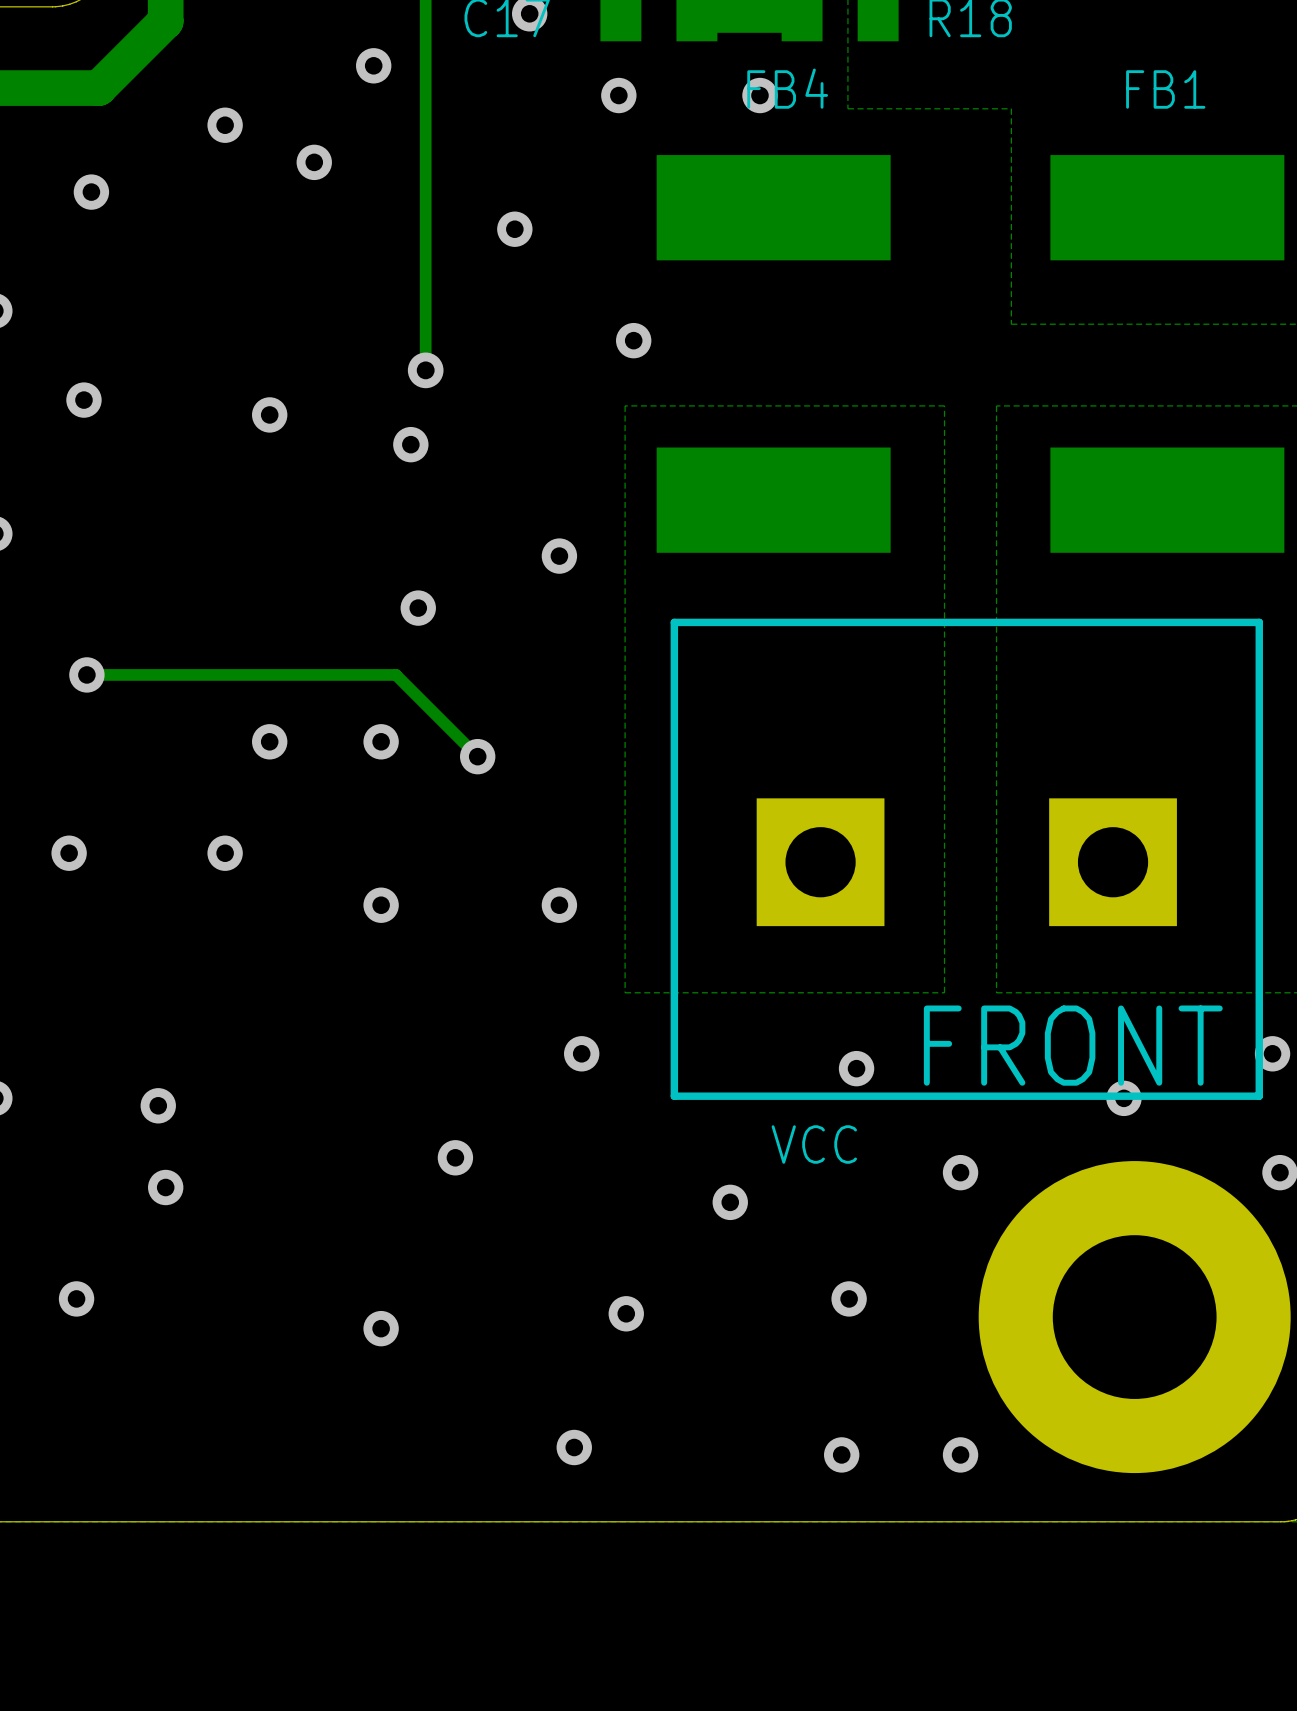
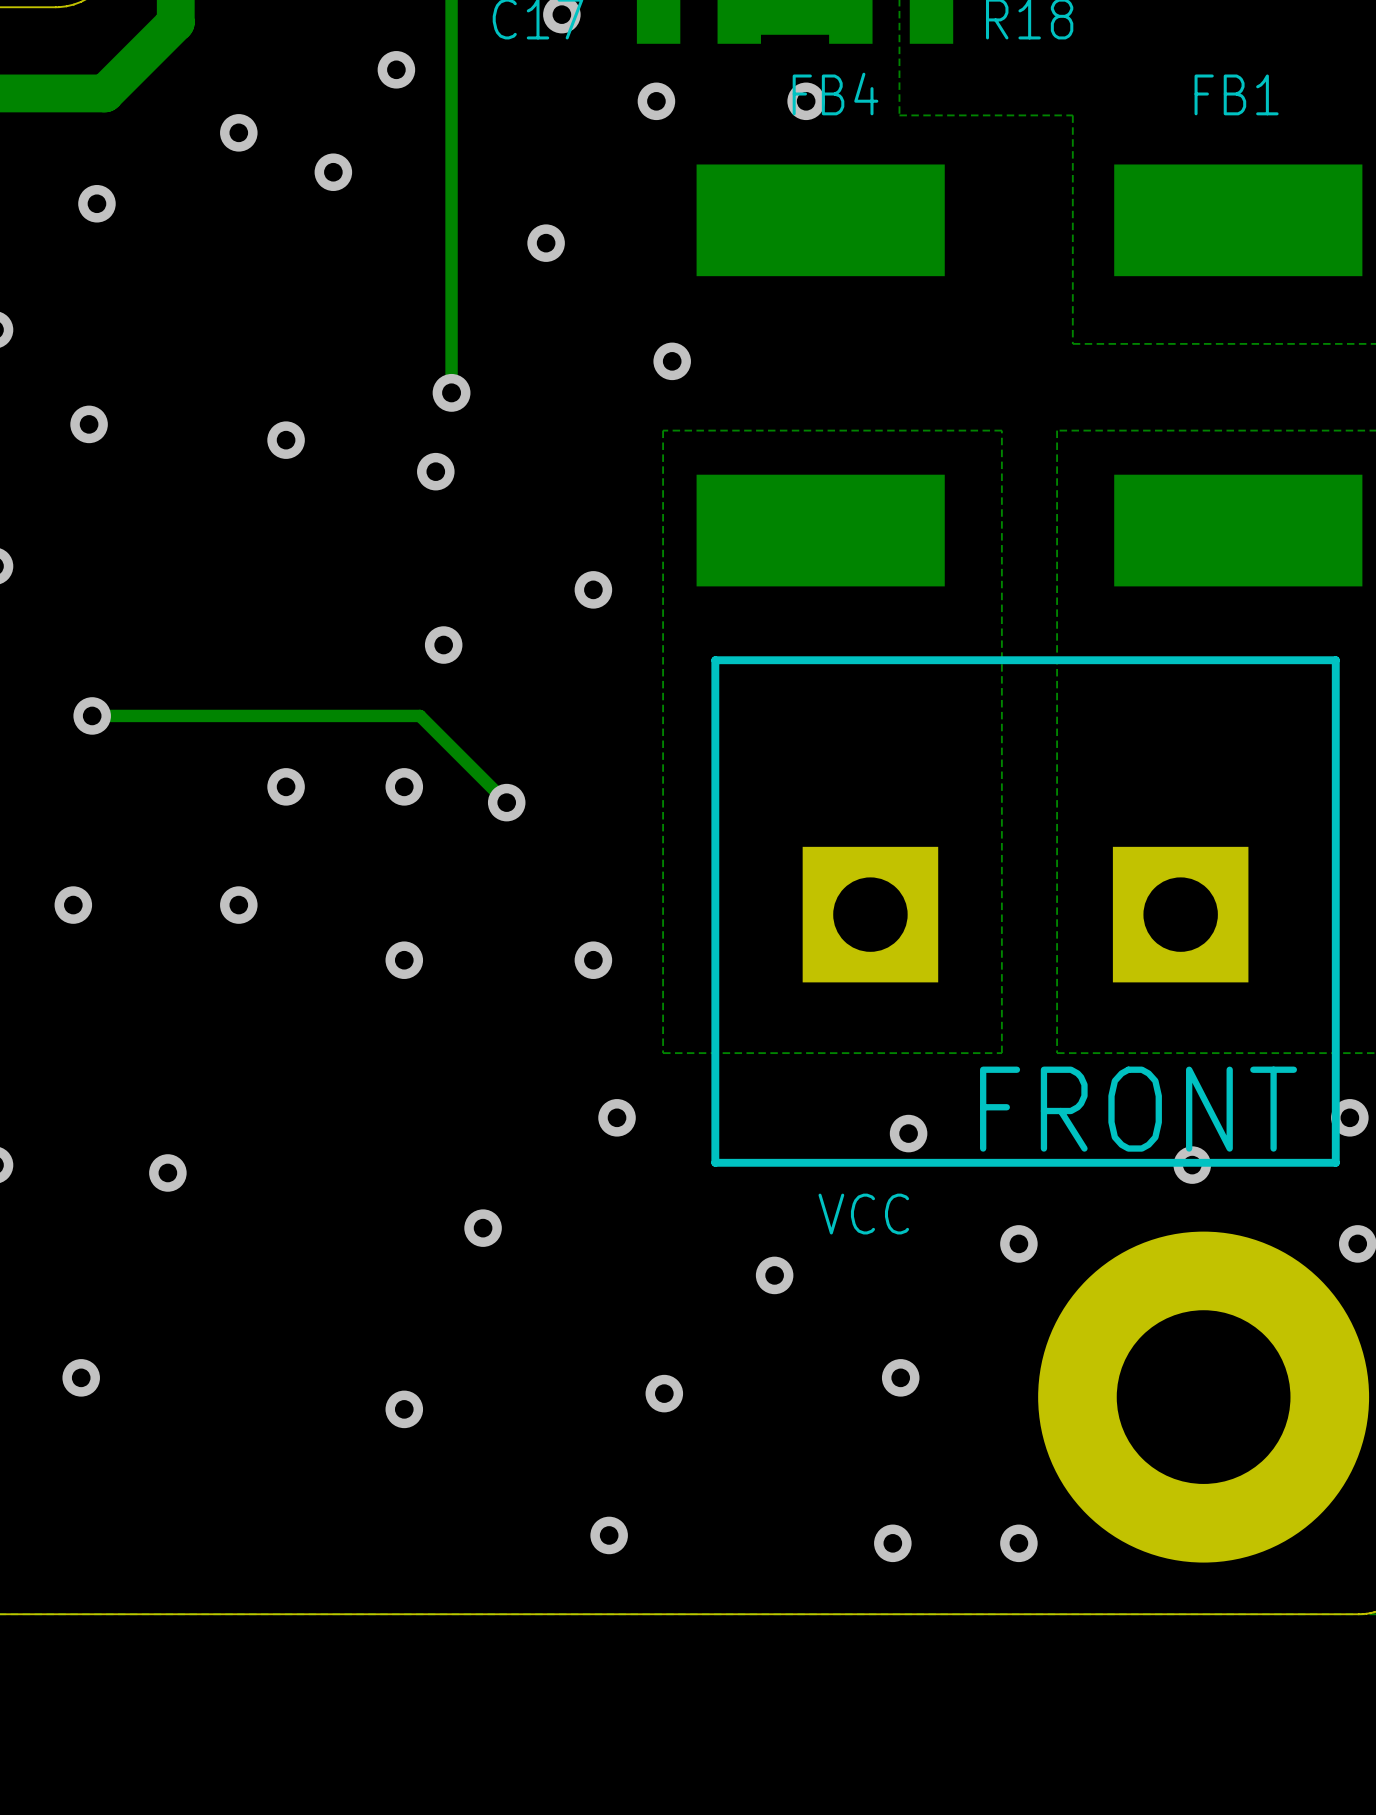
via: (165, 1187) -> none

